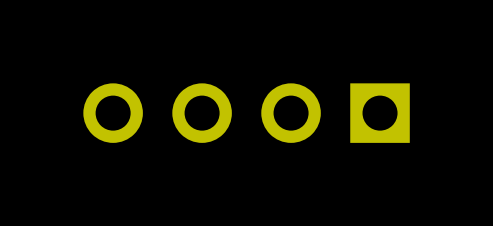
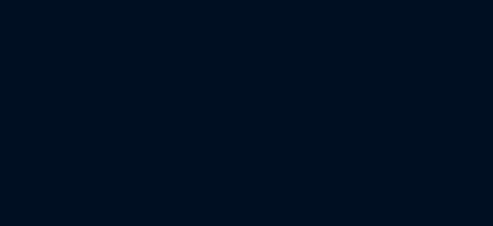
part: (246, 113) -> none

